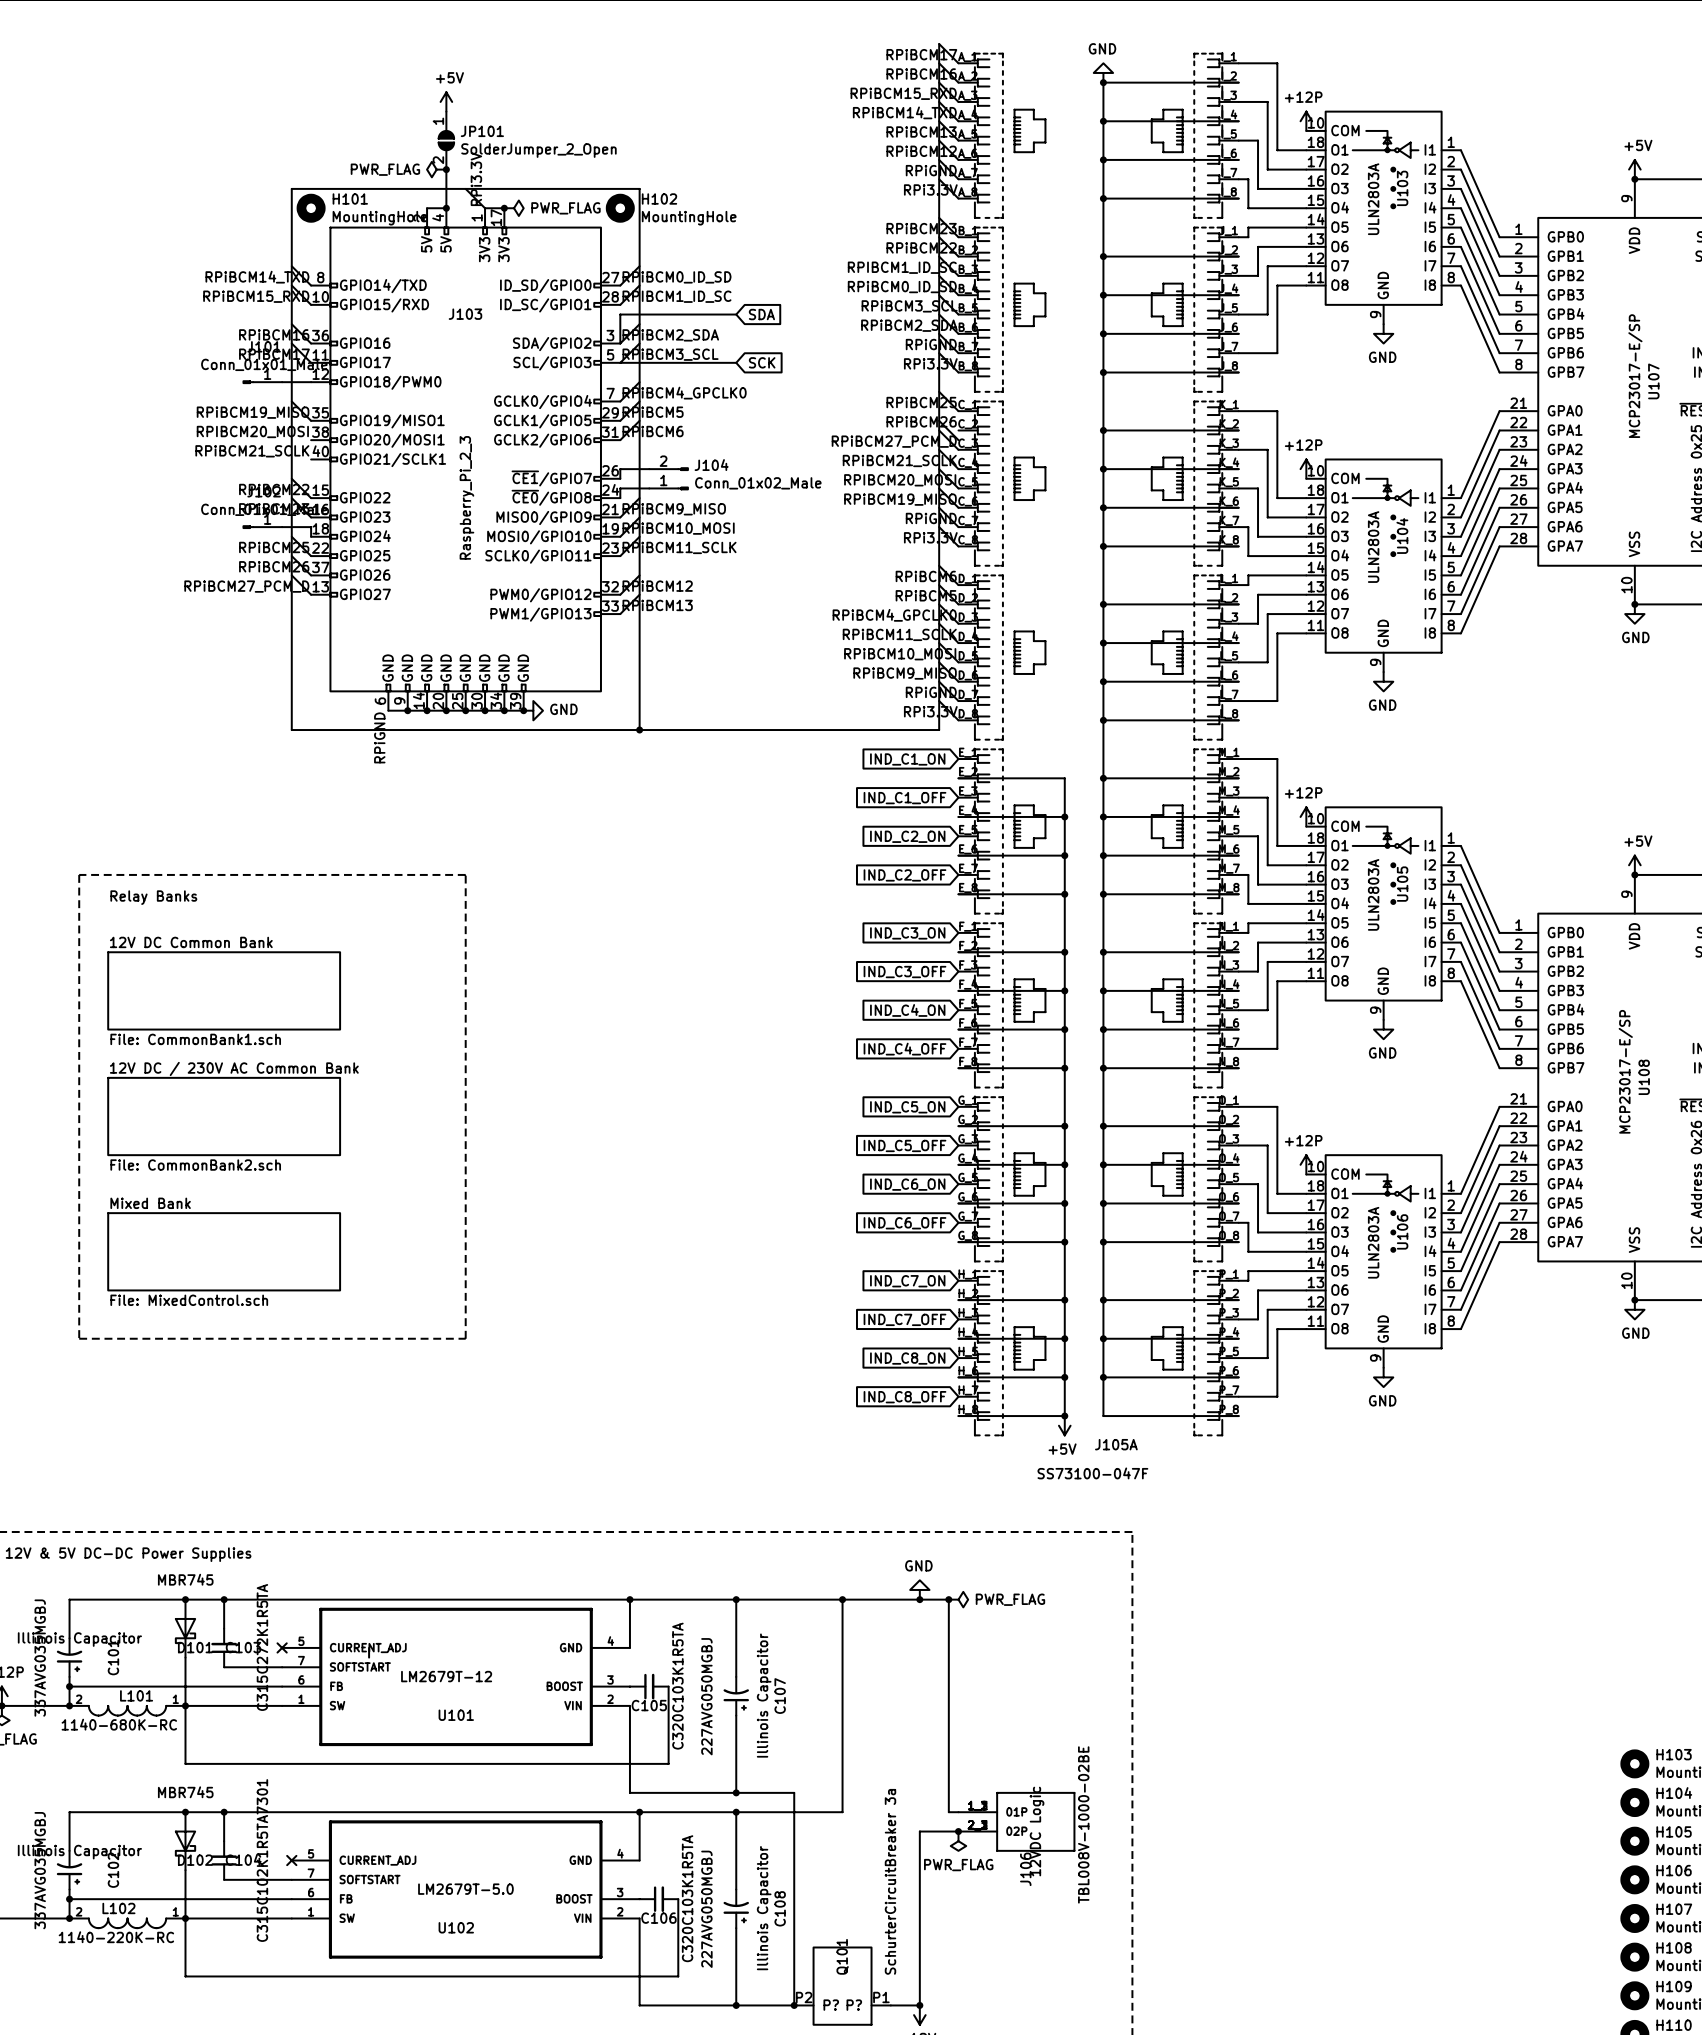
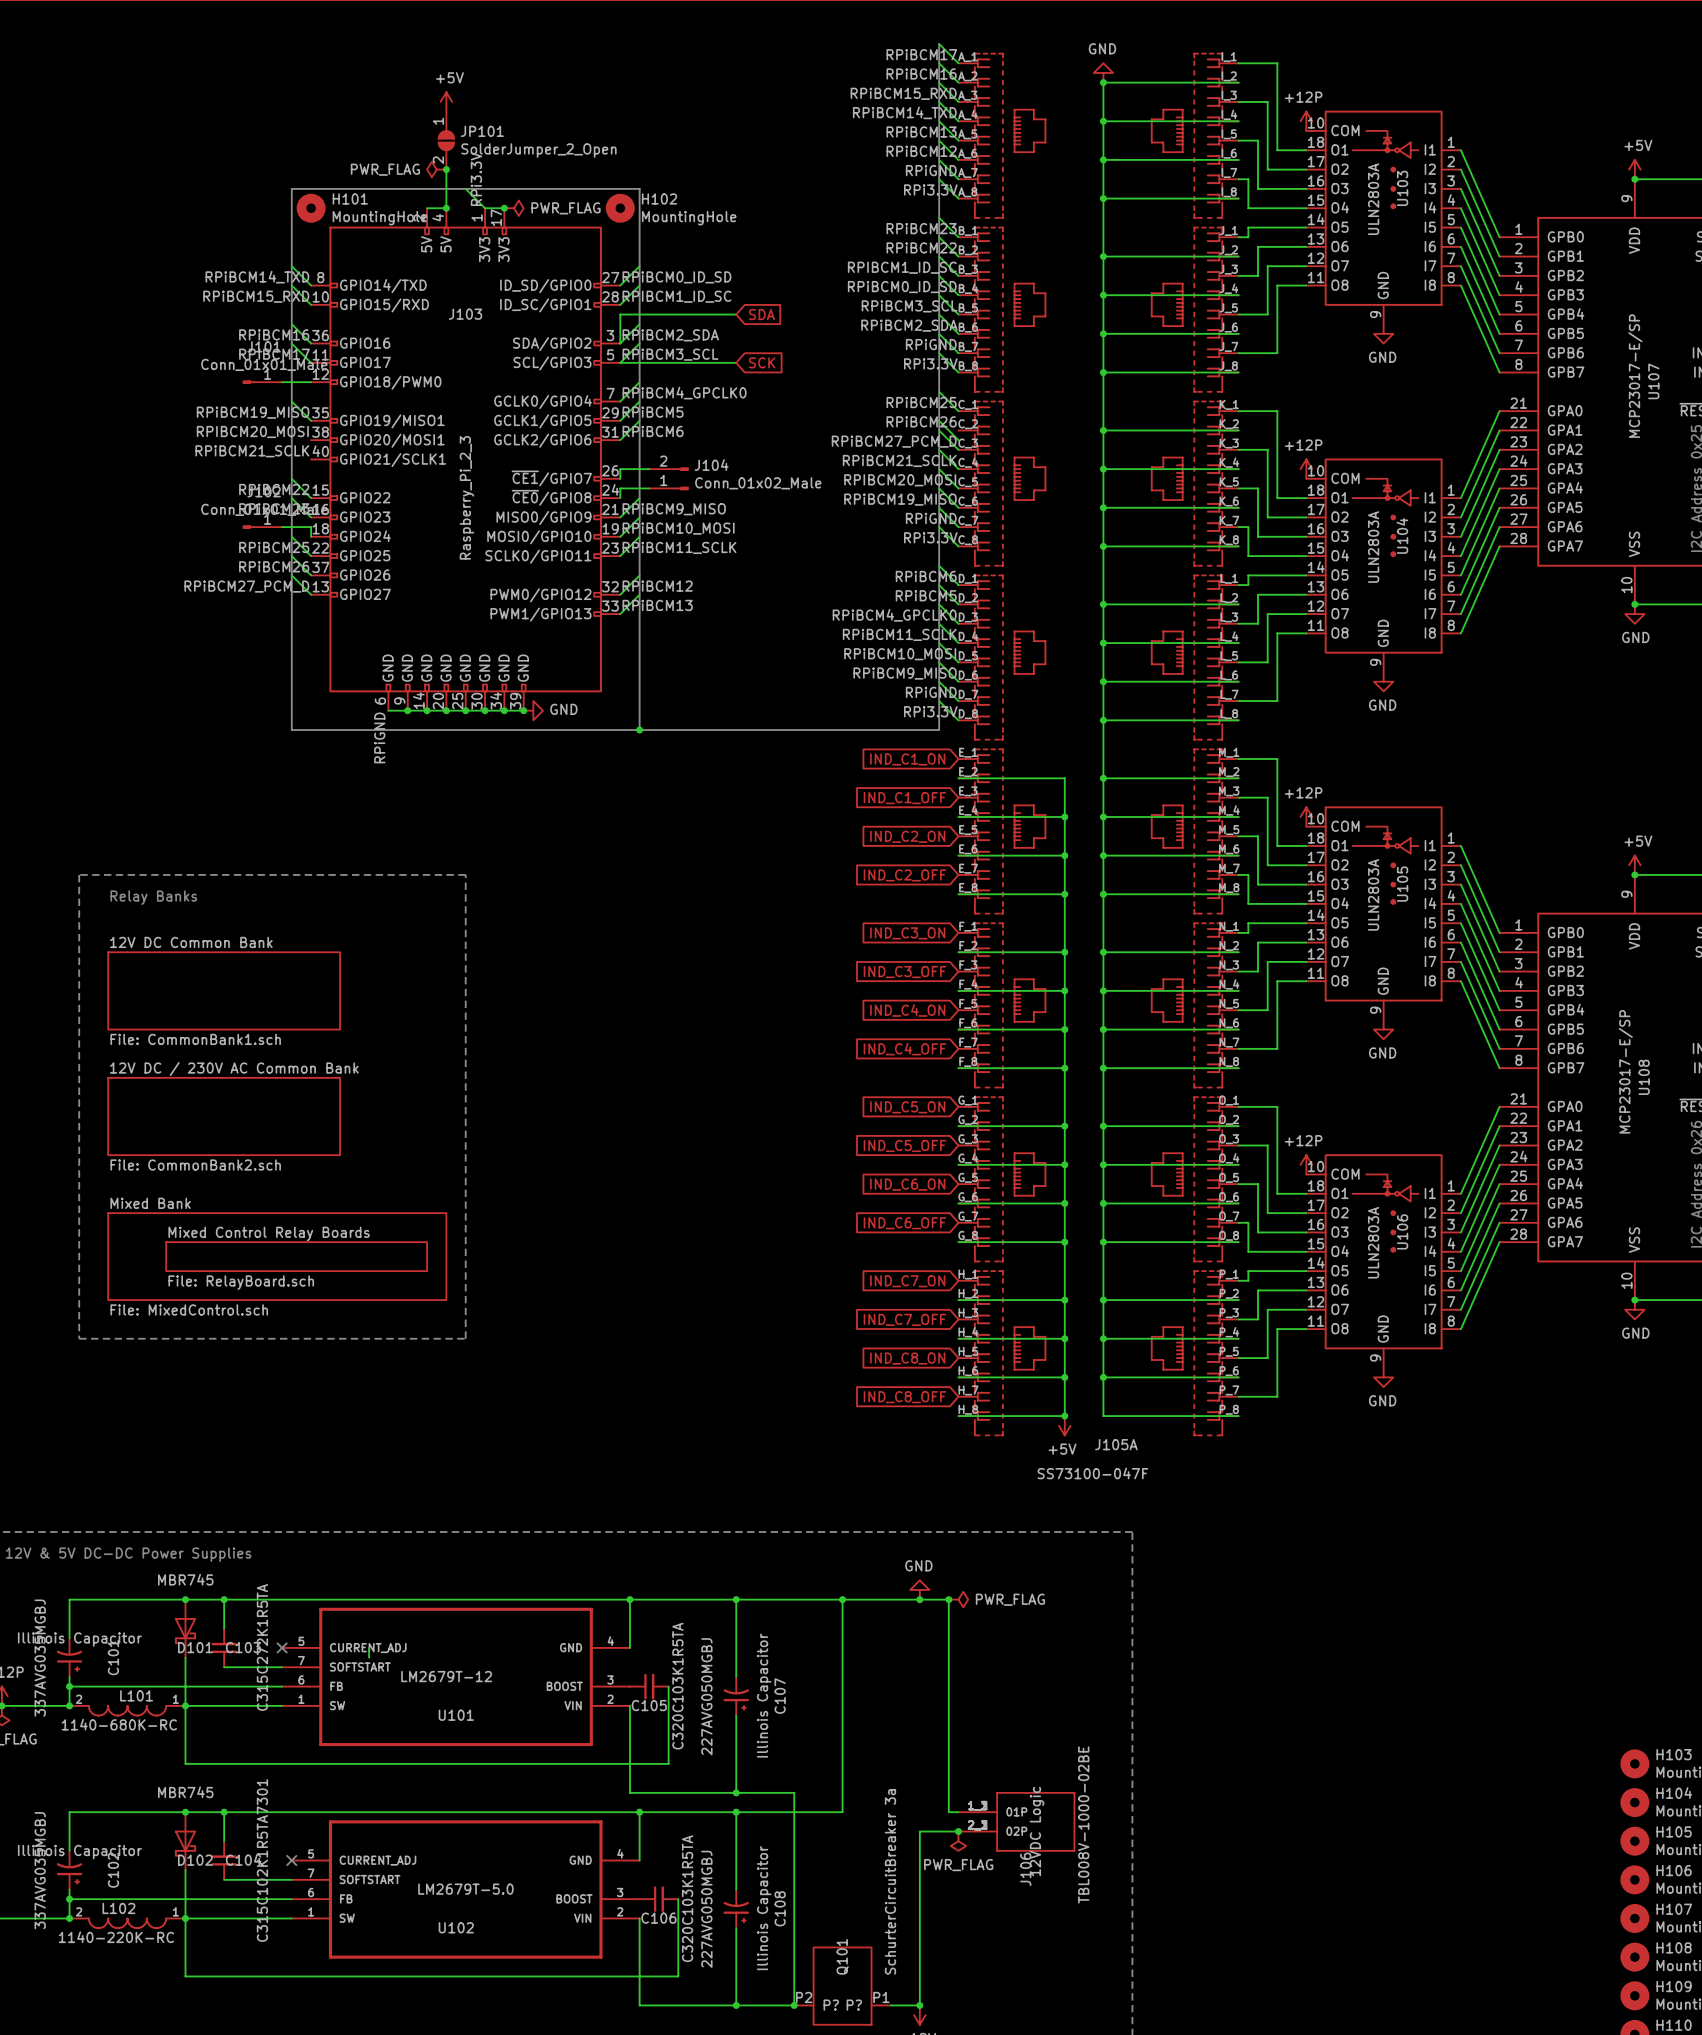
sheet Mixed Bank: File: MixedControl.sch (224, 1251) -> none
sheet Mixed Bank: none -> File: MixedControl.sch (277, 1256)
sheet Mixed Control Relay Boards: none -> File: RelayBoard.sch (296, 1256)

